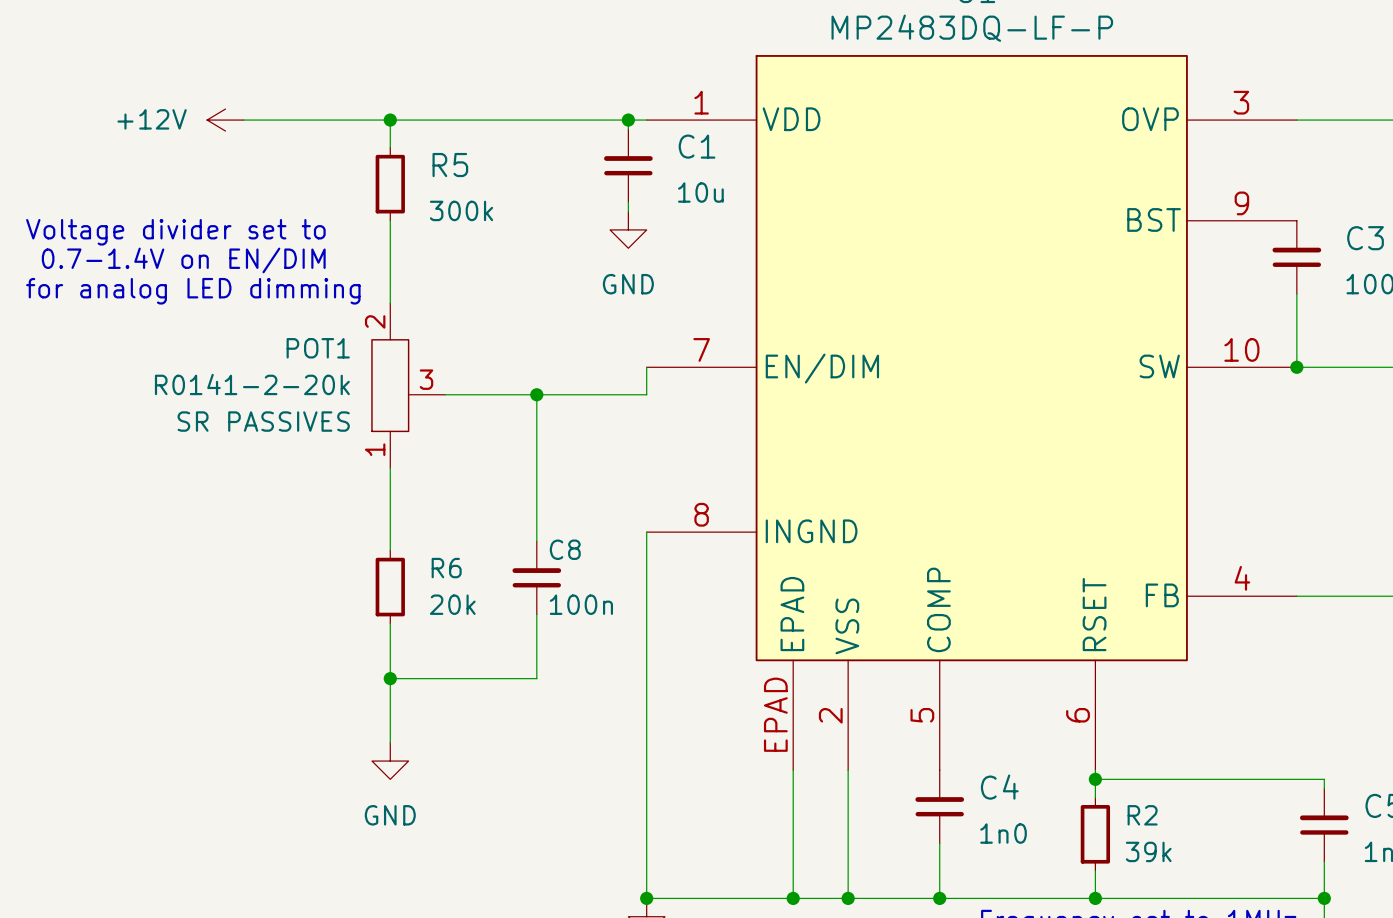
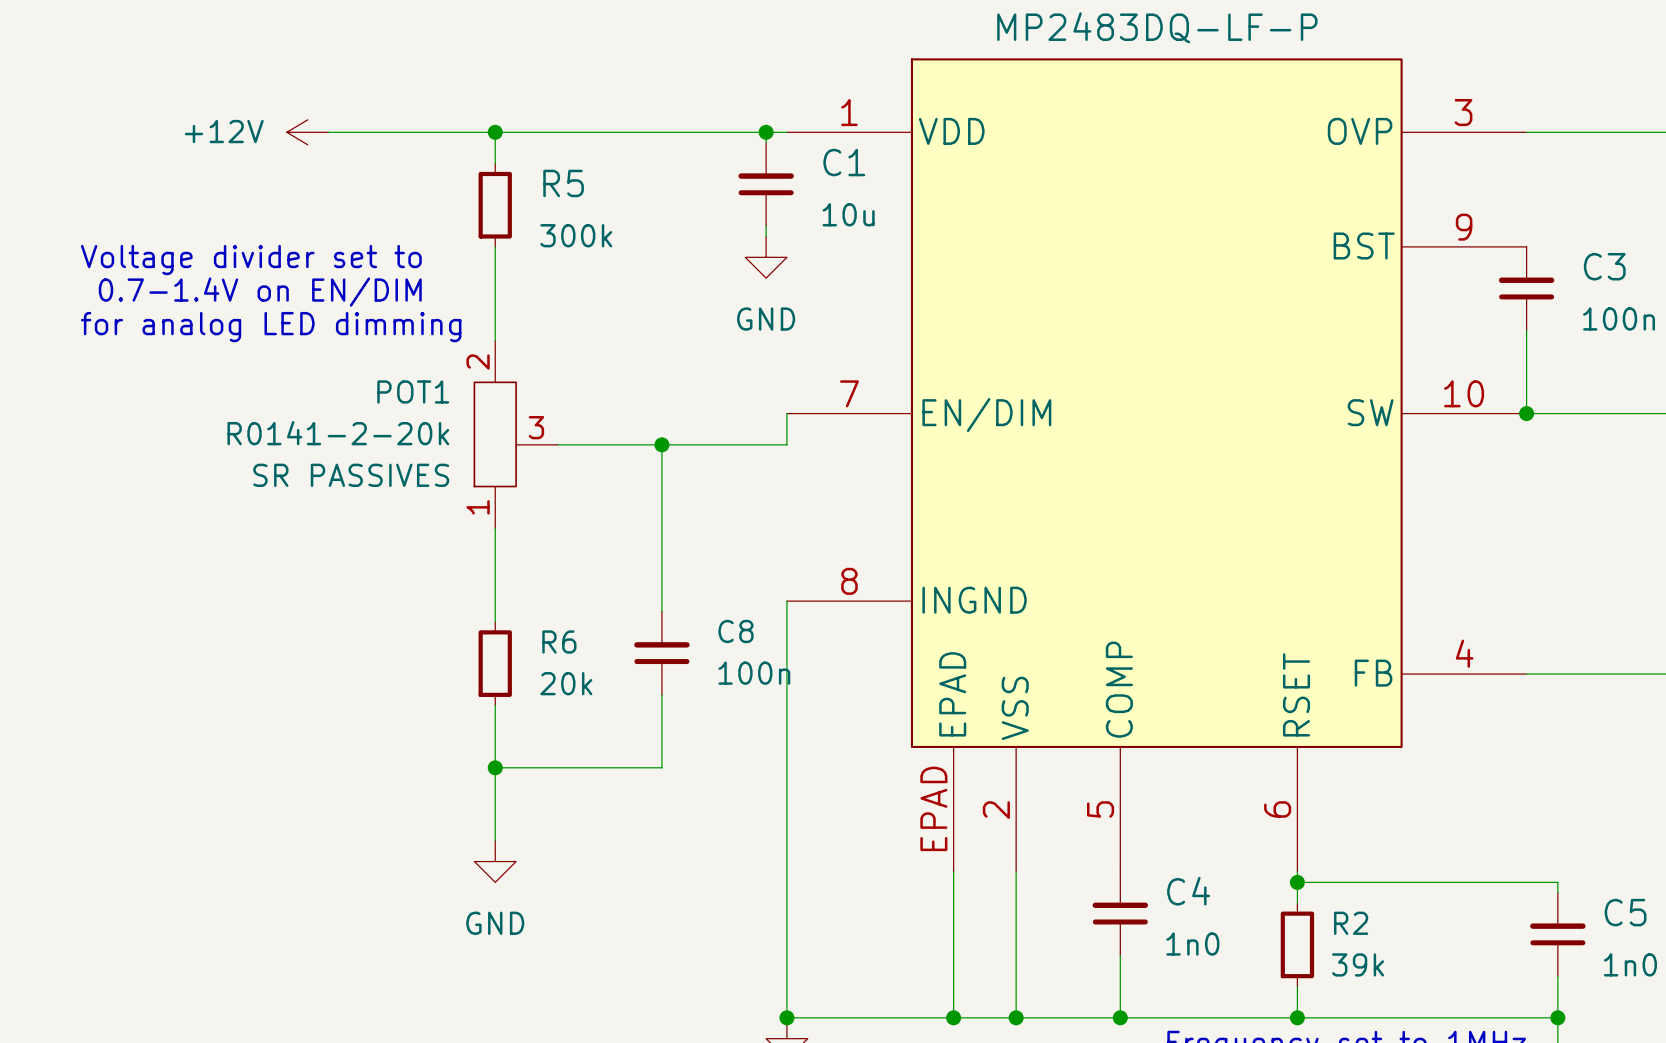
C8 name position: C8 (565, 549) -> C8 (735, 631)
C8 text position: 100n (581, 604) -> 100n (754, 673)

